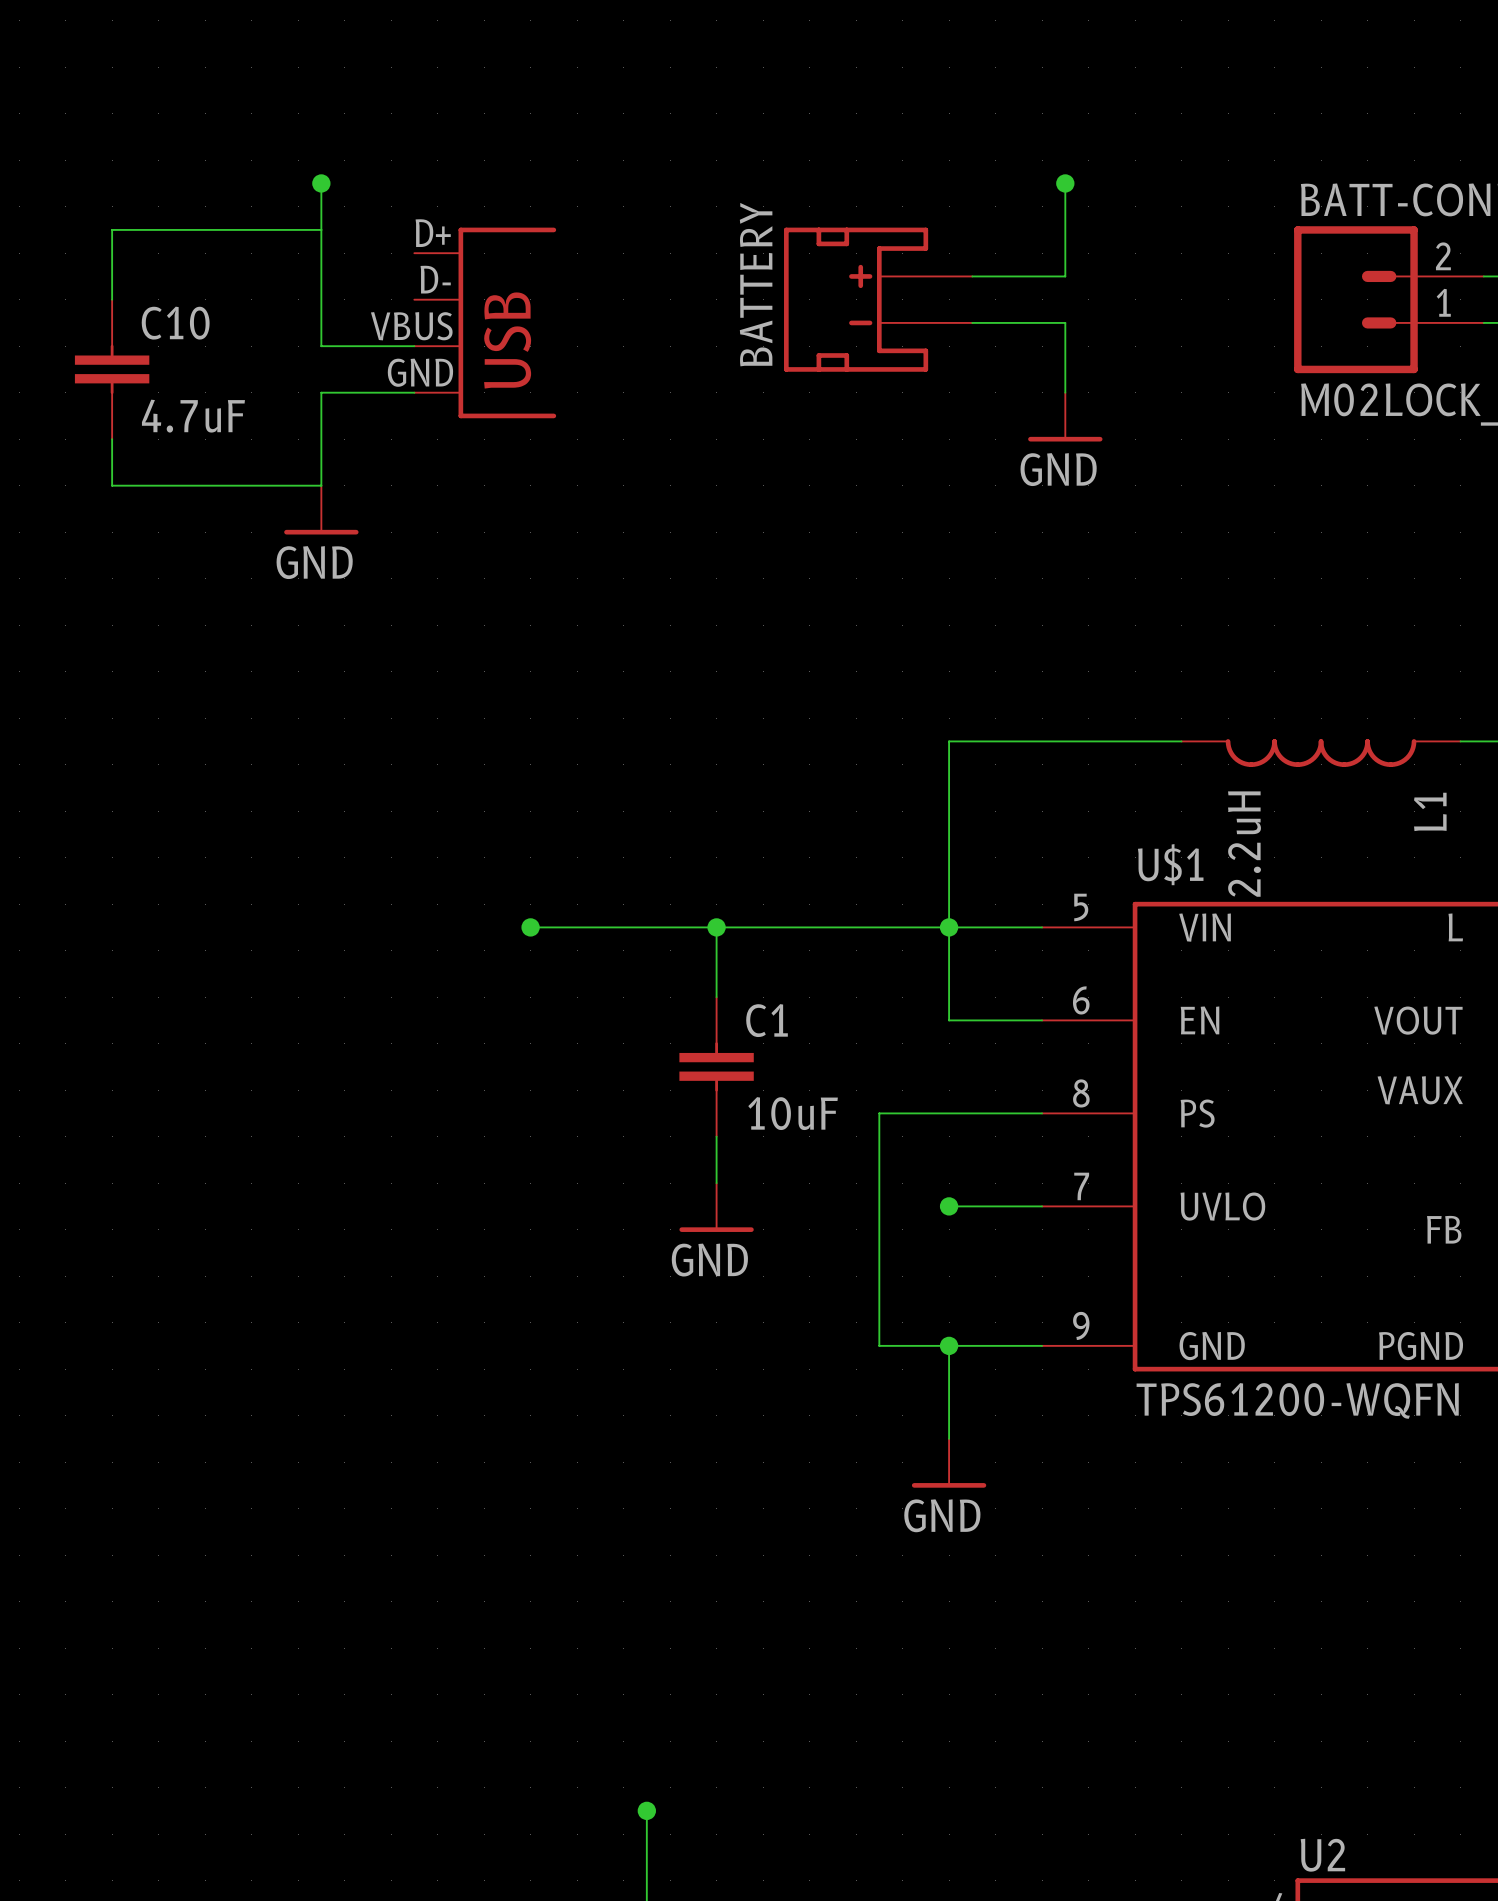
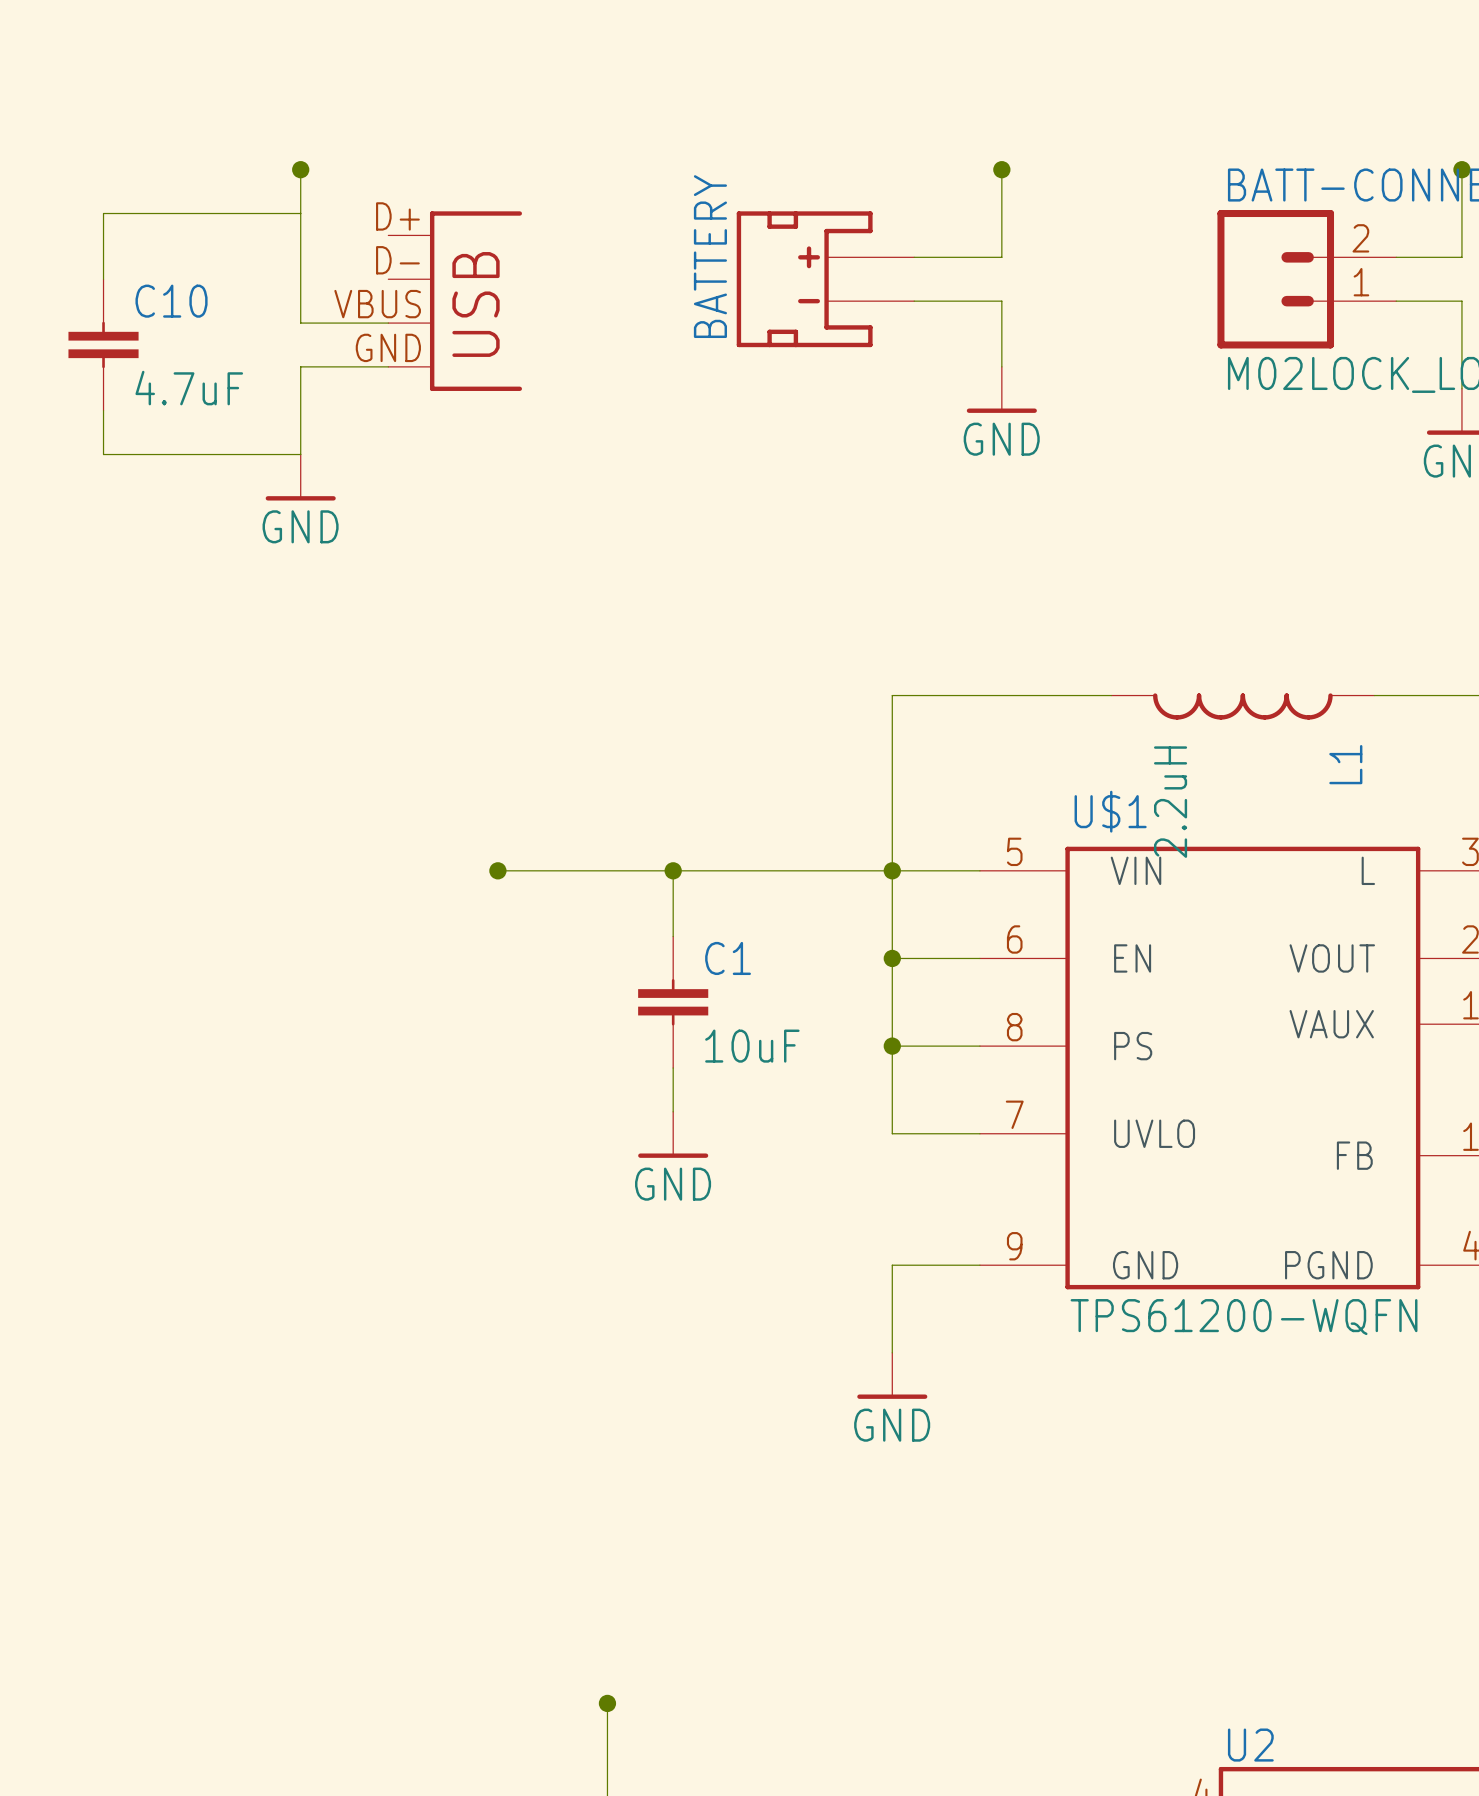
wire: none -> (892, 958) (892, 1133)
junction: none -> (892, 958)
wire: (949, 1113) (879, 1113) (879, 1345) (949, 1345) -> none
junction: none -> (892, 1046)
junction: (949, 1206) -> none
junction: (949, 1345) -> none

